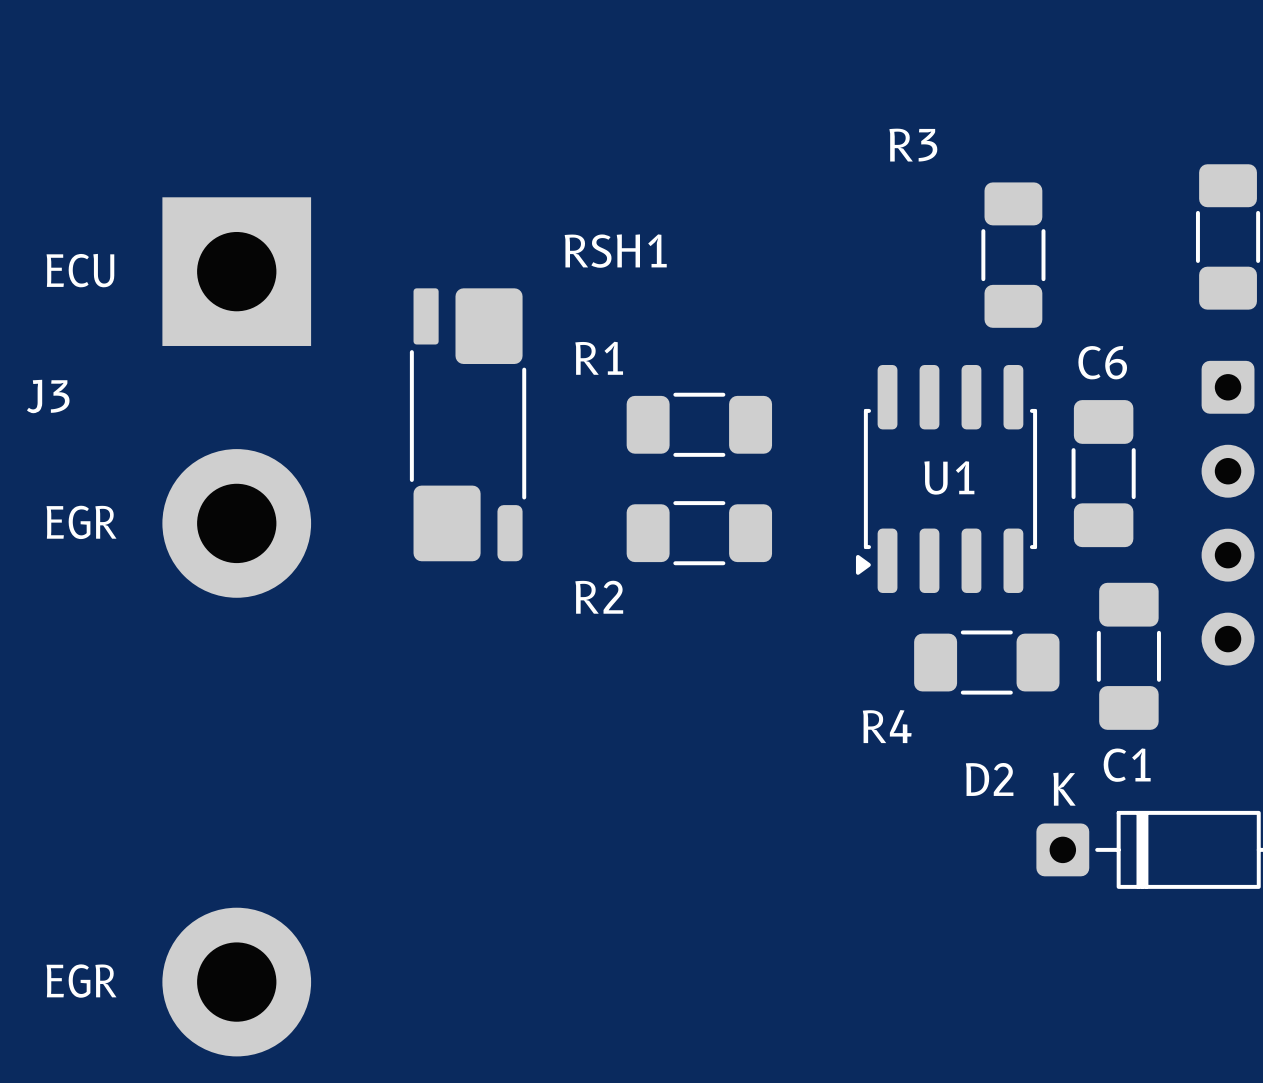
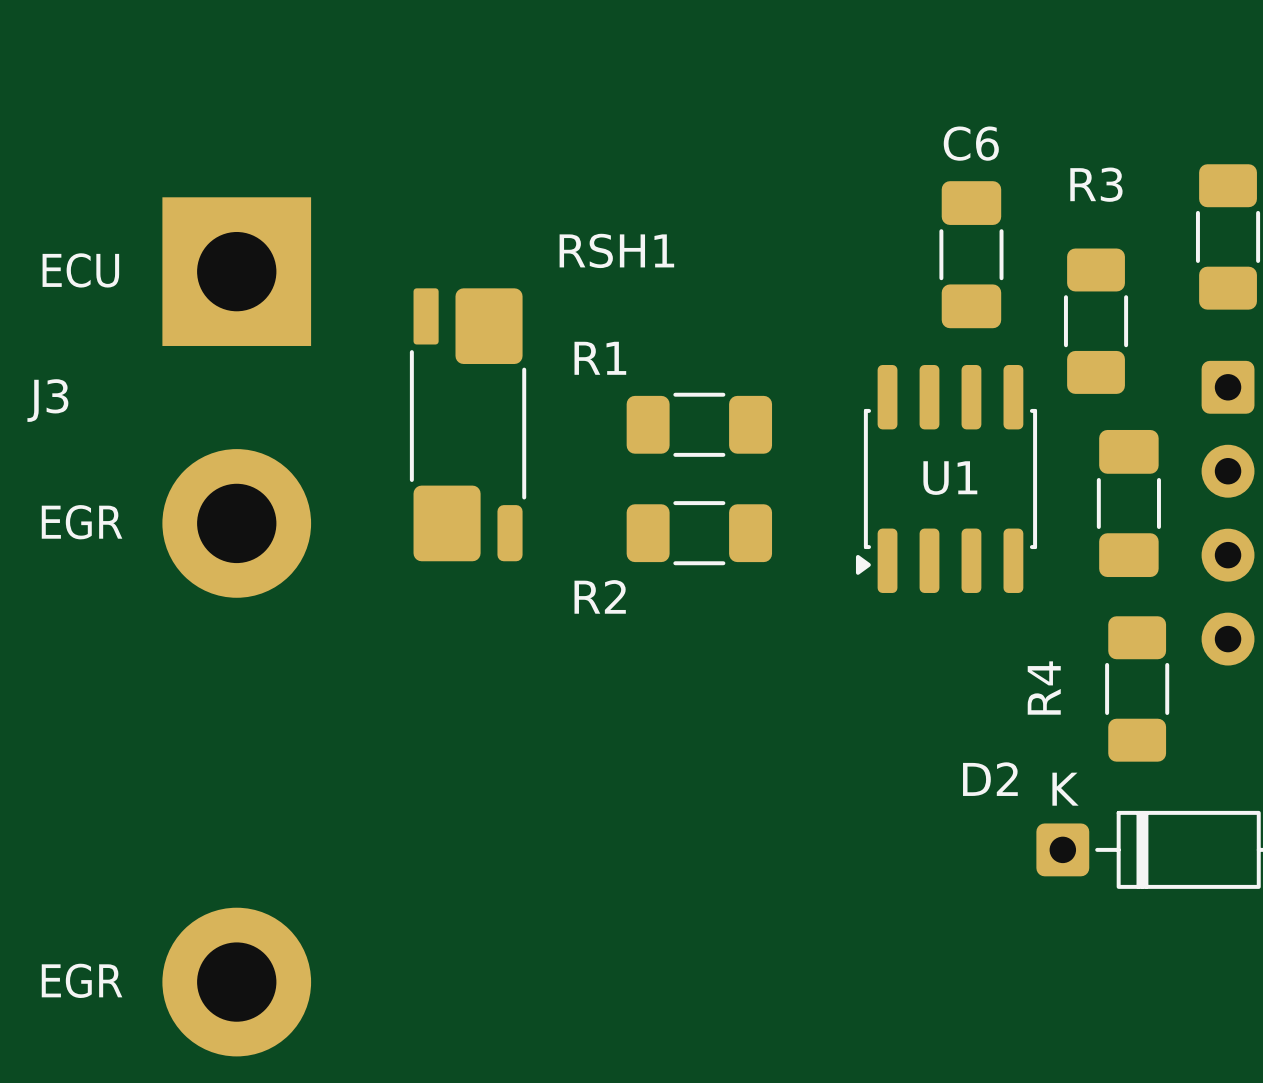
R3 name position: R3 (913, 145) -> R3 (1096, 184)
R3 position: (1013, 255) -> (1096, 321)
C6 position: (1103, 473) -> (971, 254)
part: none -> (1128, 503)
C1: (1128, 656) -> none
R4 rotation: 0° (986, 662) -> 90° clockwise (1137, 688)
R4 position: (986, 662) -> (1137, 688)
R4 name position: R4 (887, 726) -> R4 (1044, 688)

